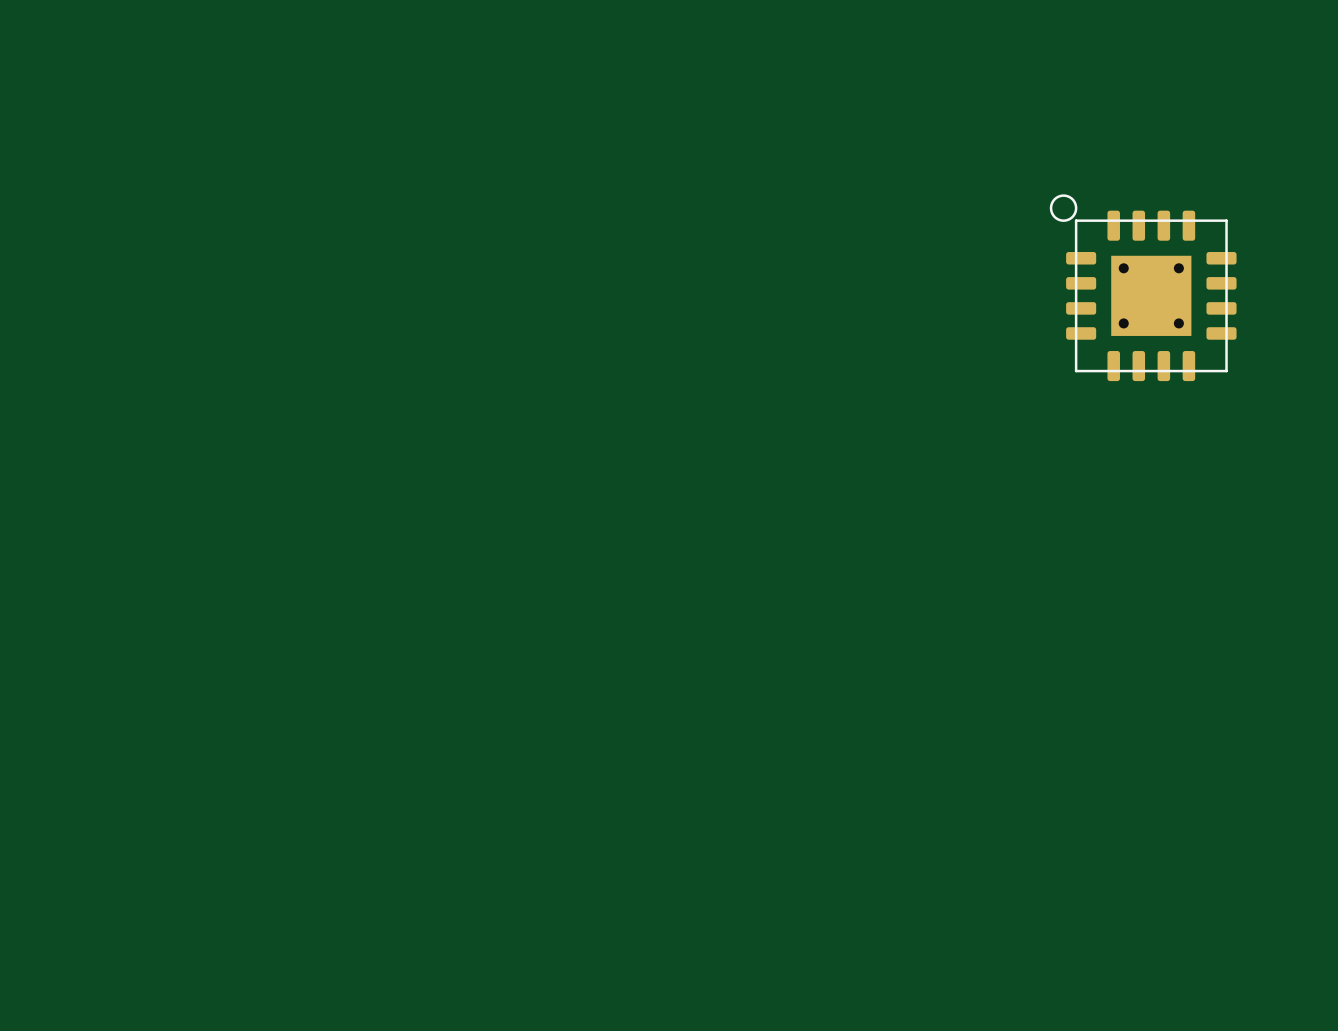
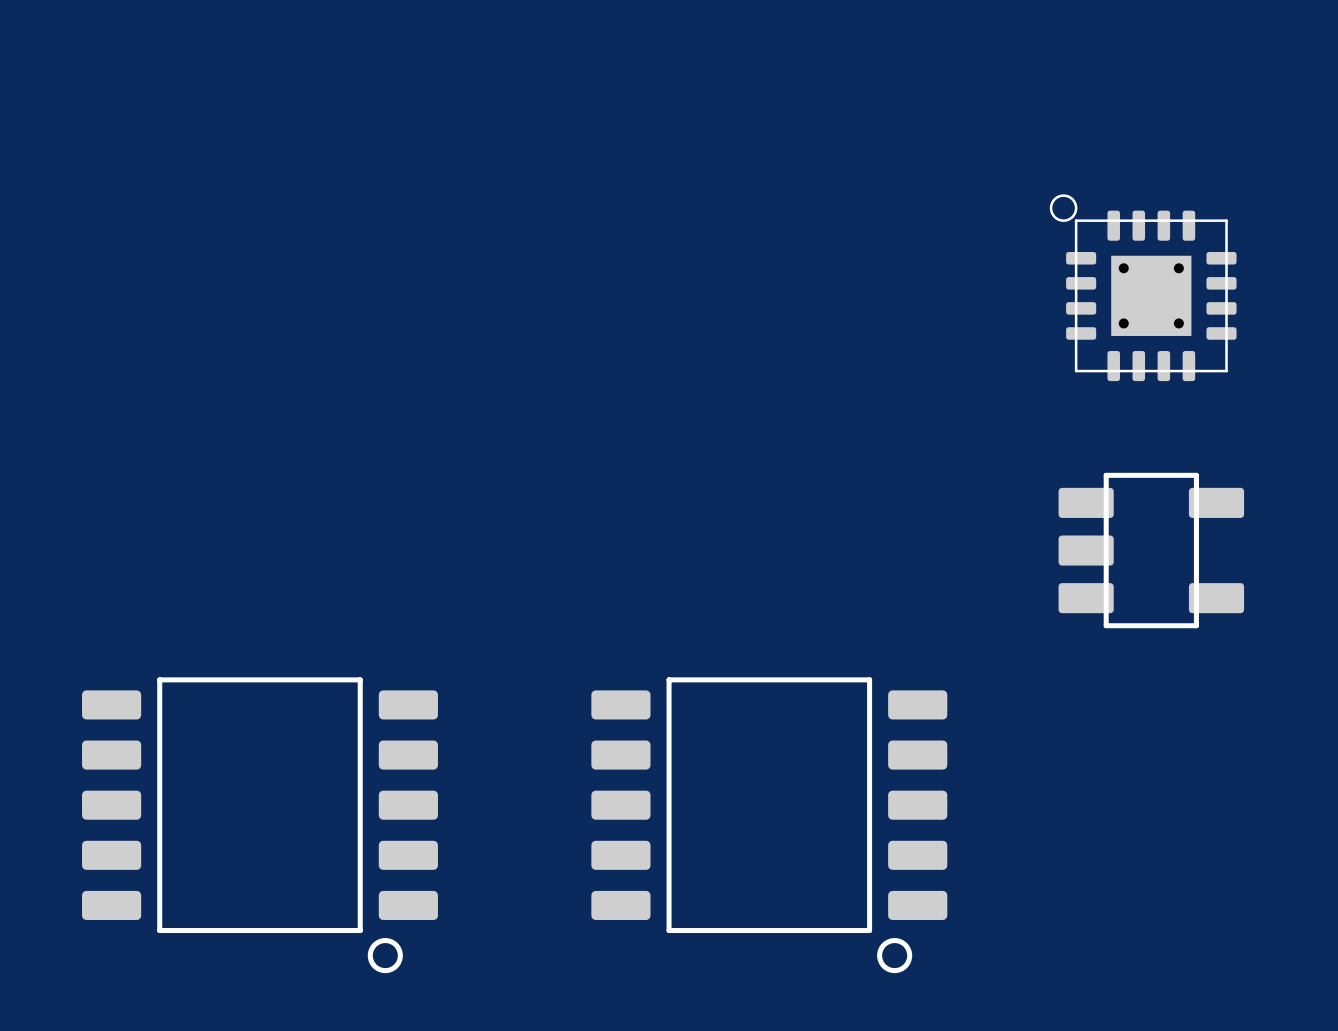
part: none -> (1151, 550)
part: none -> (259, 825)
part: none -> (769, 825)

